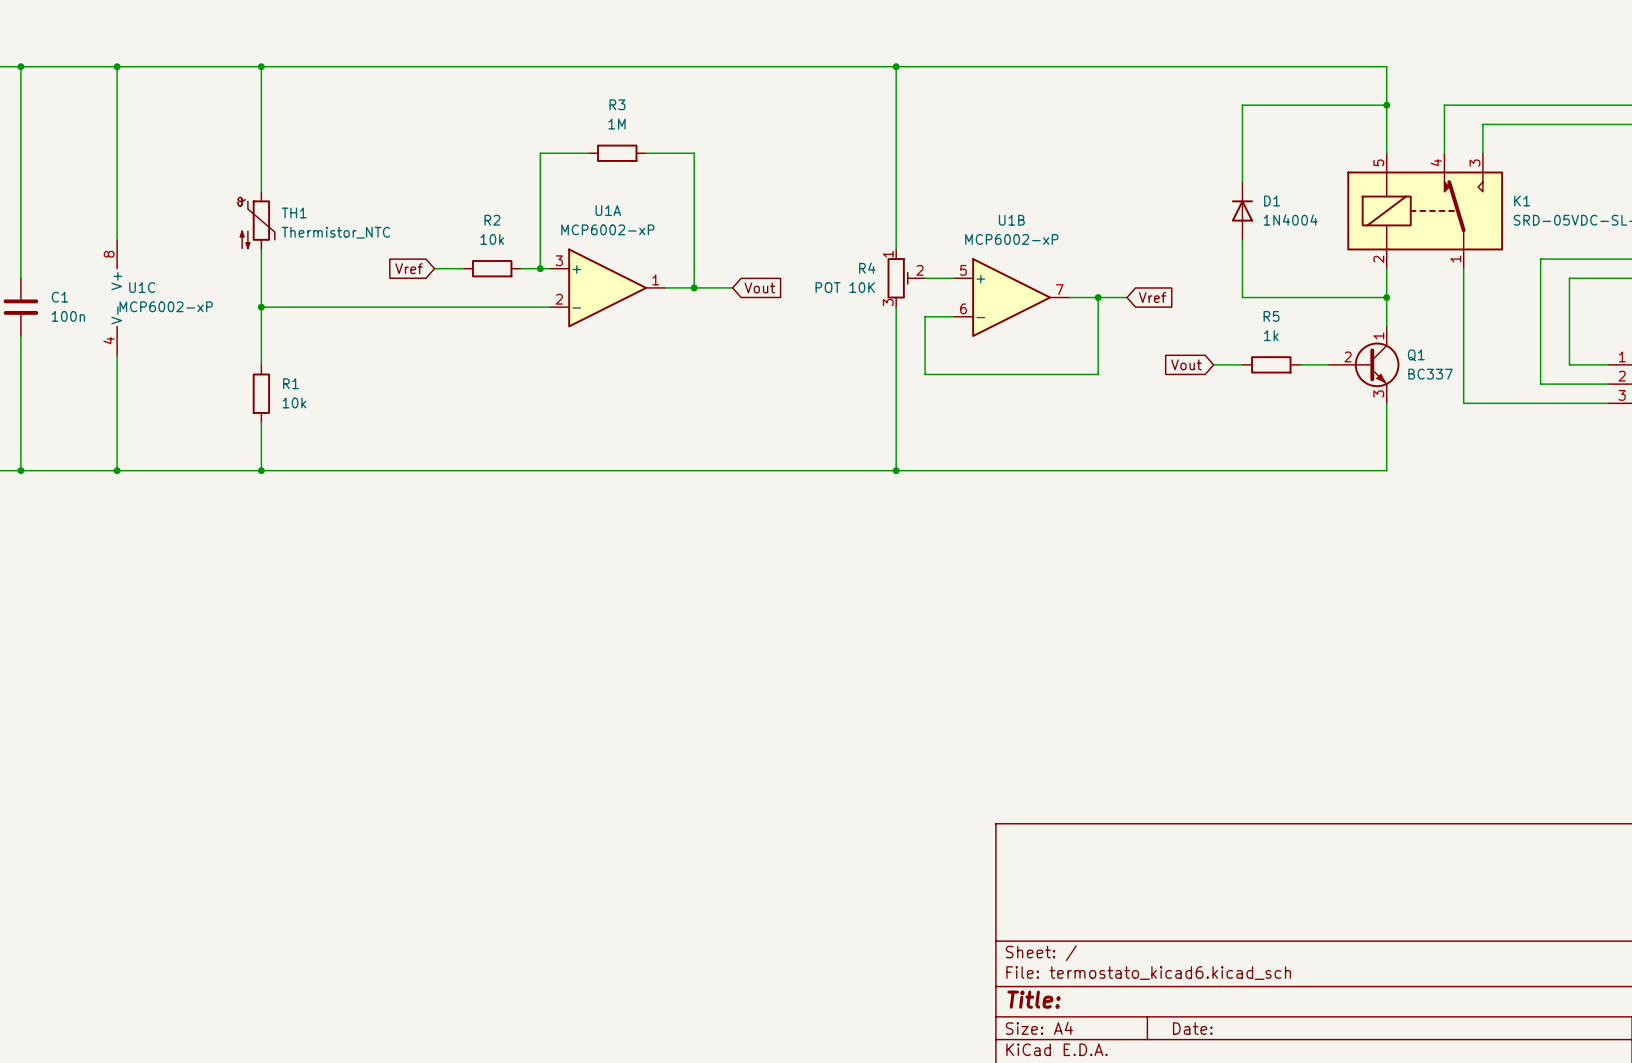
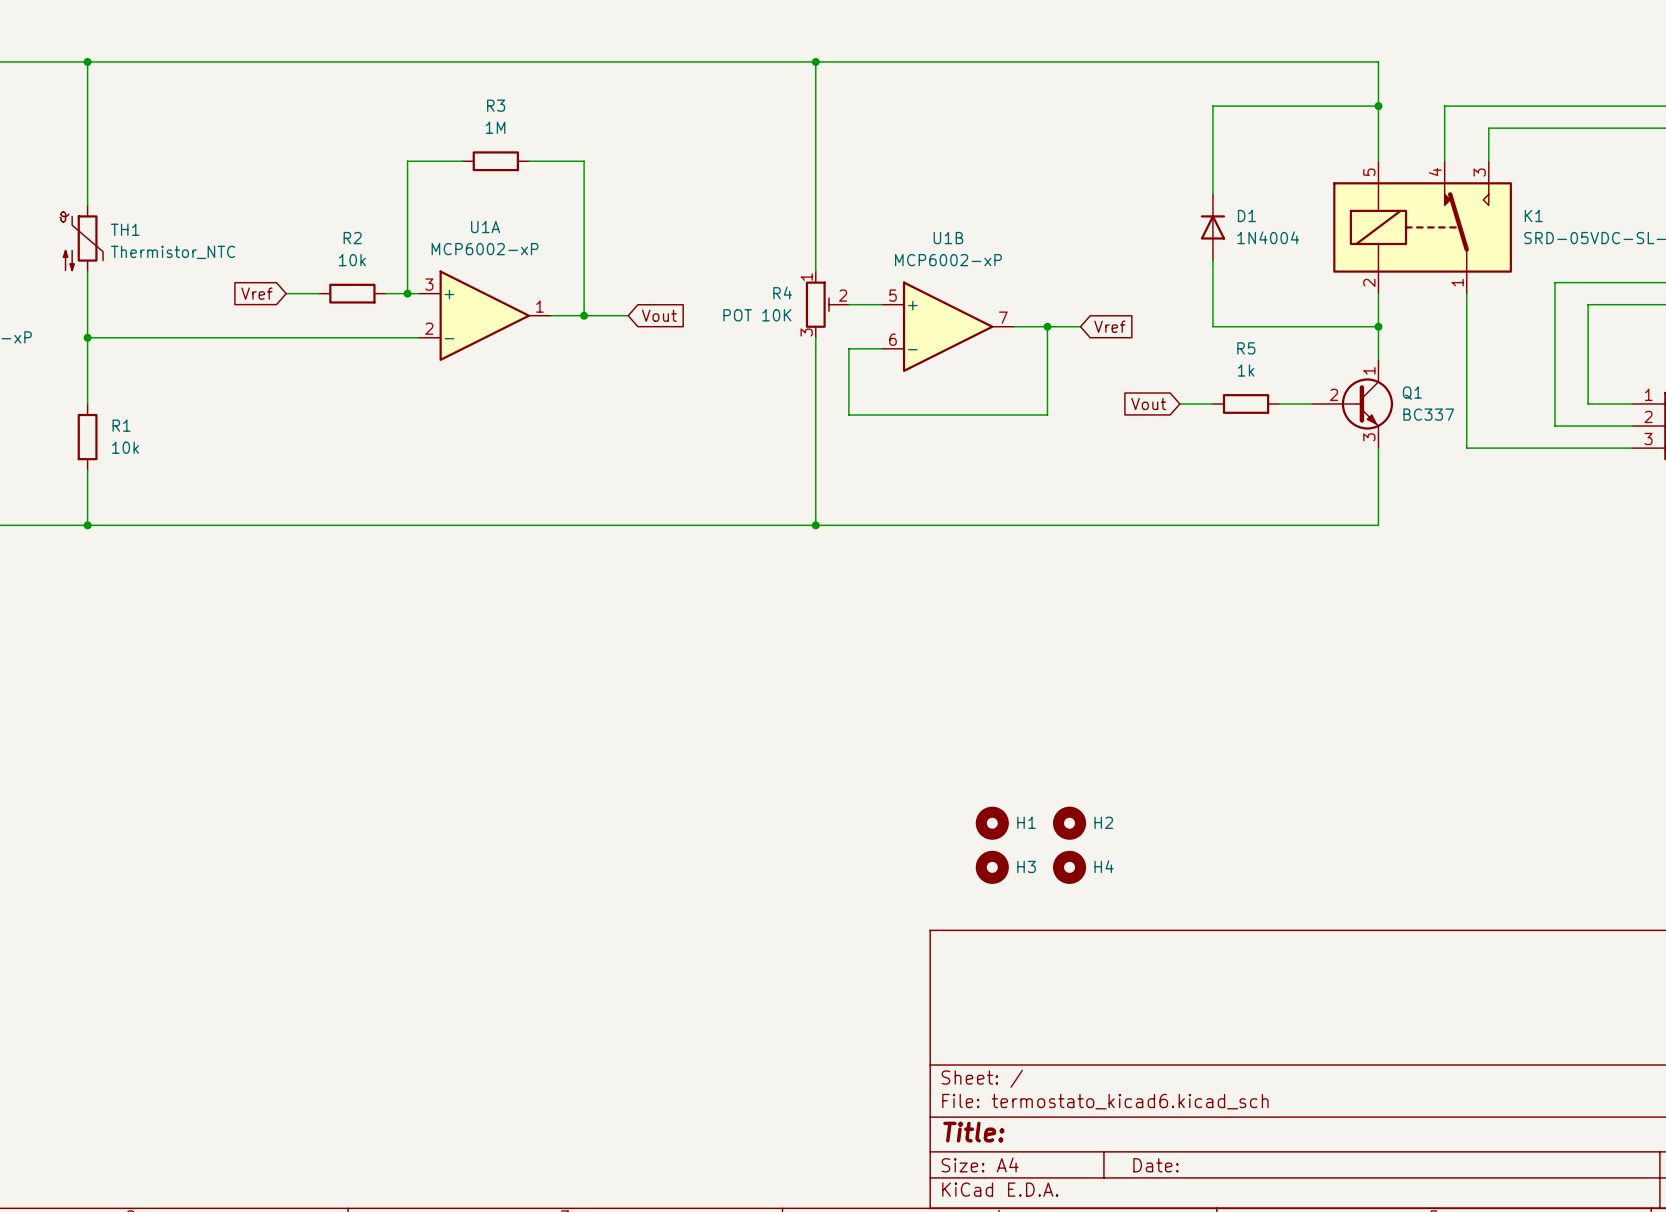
H1: none -> (992, 823)
H2: none -> (1069, 823)
H3: none -> (992, 867)
H4: none -> (1069, 867)

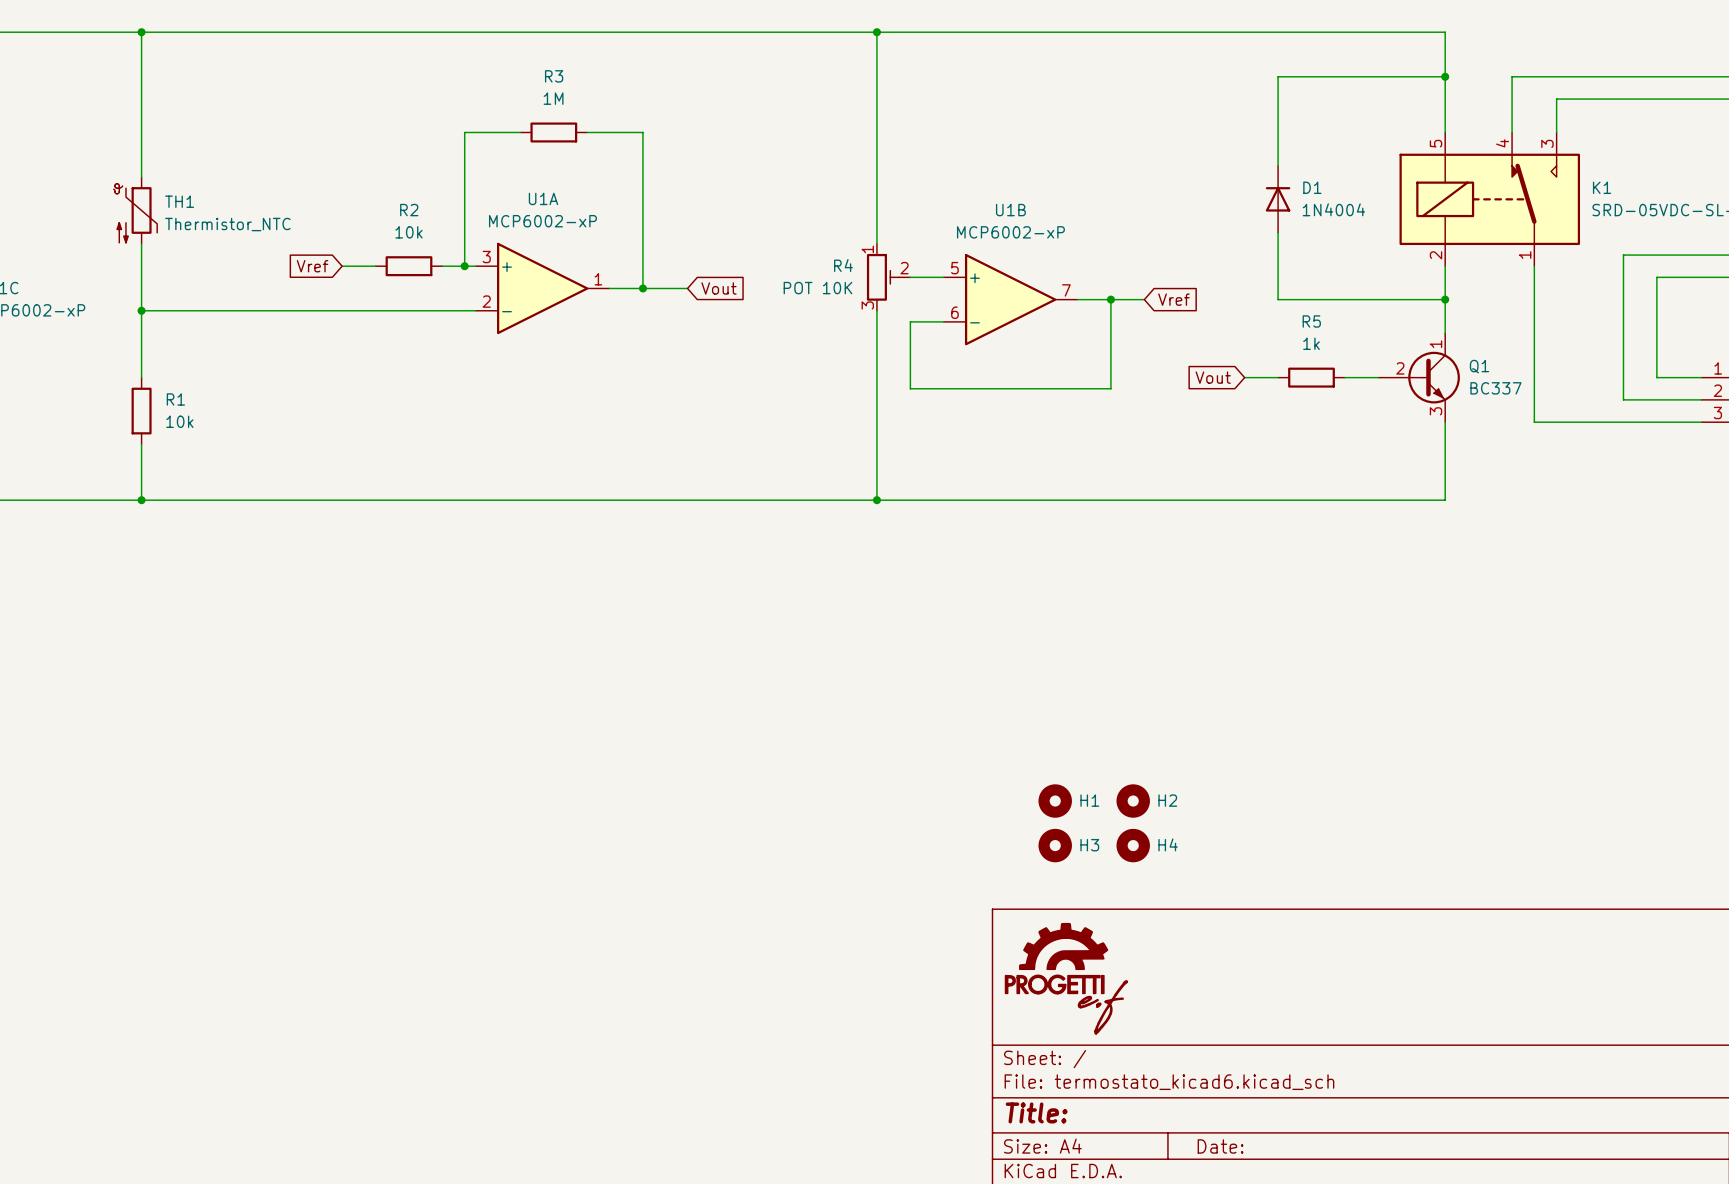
power symbol: none -> (1066, 978)

